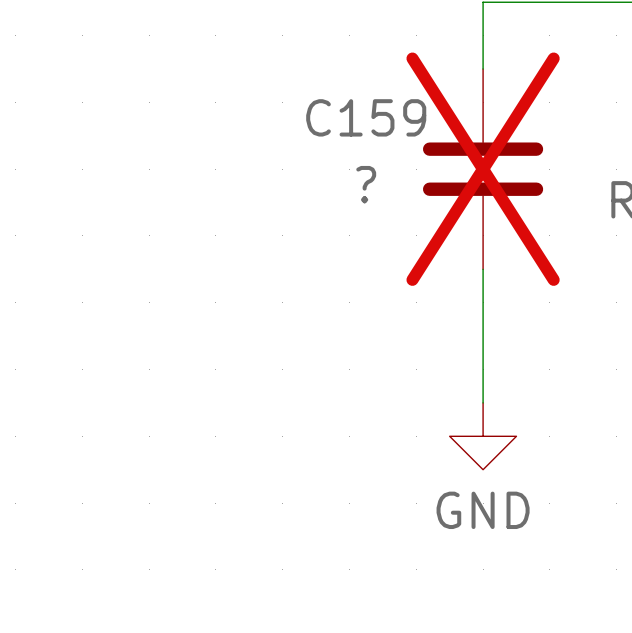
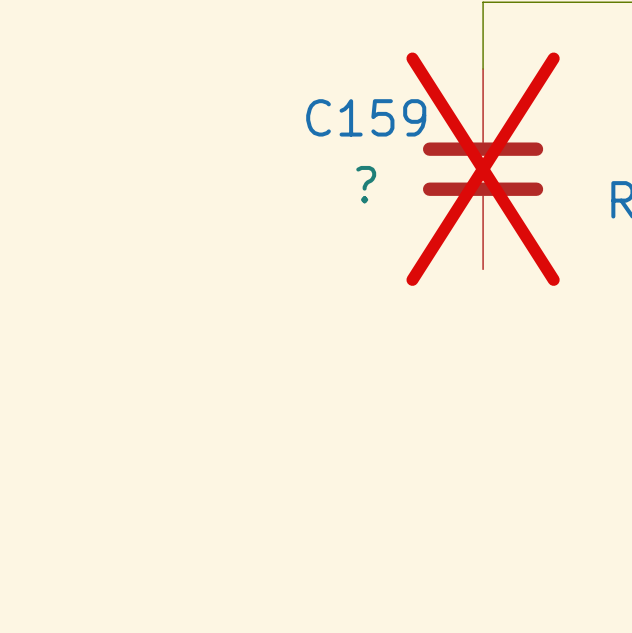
wire: (483, 269) (483, 402) -> none
power symbol: GND (483, 436) -> none

